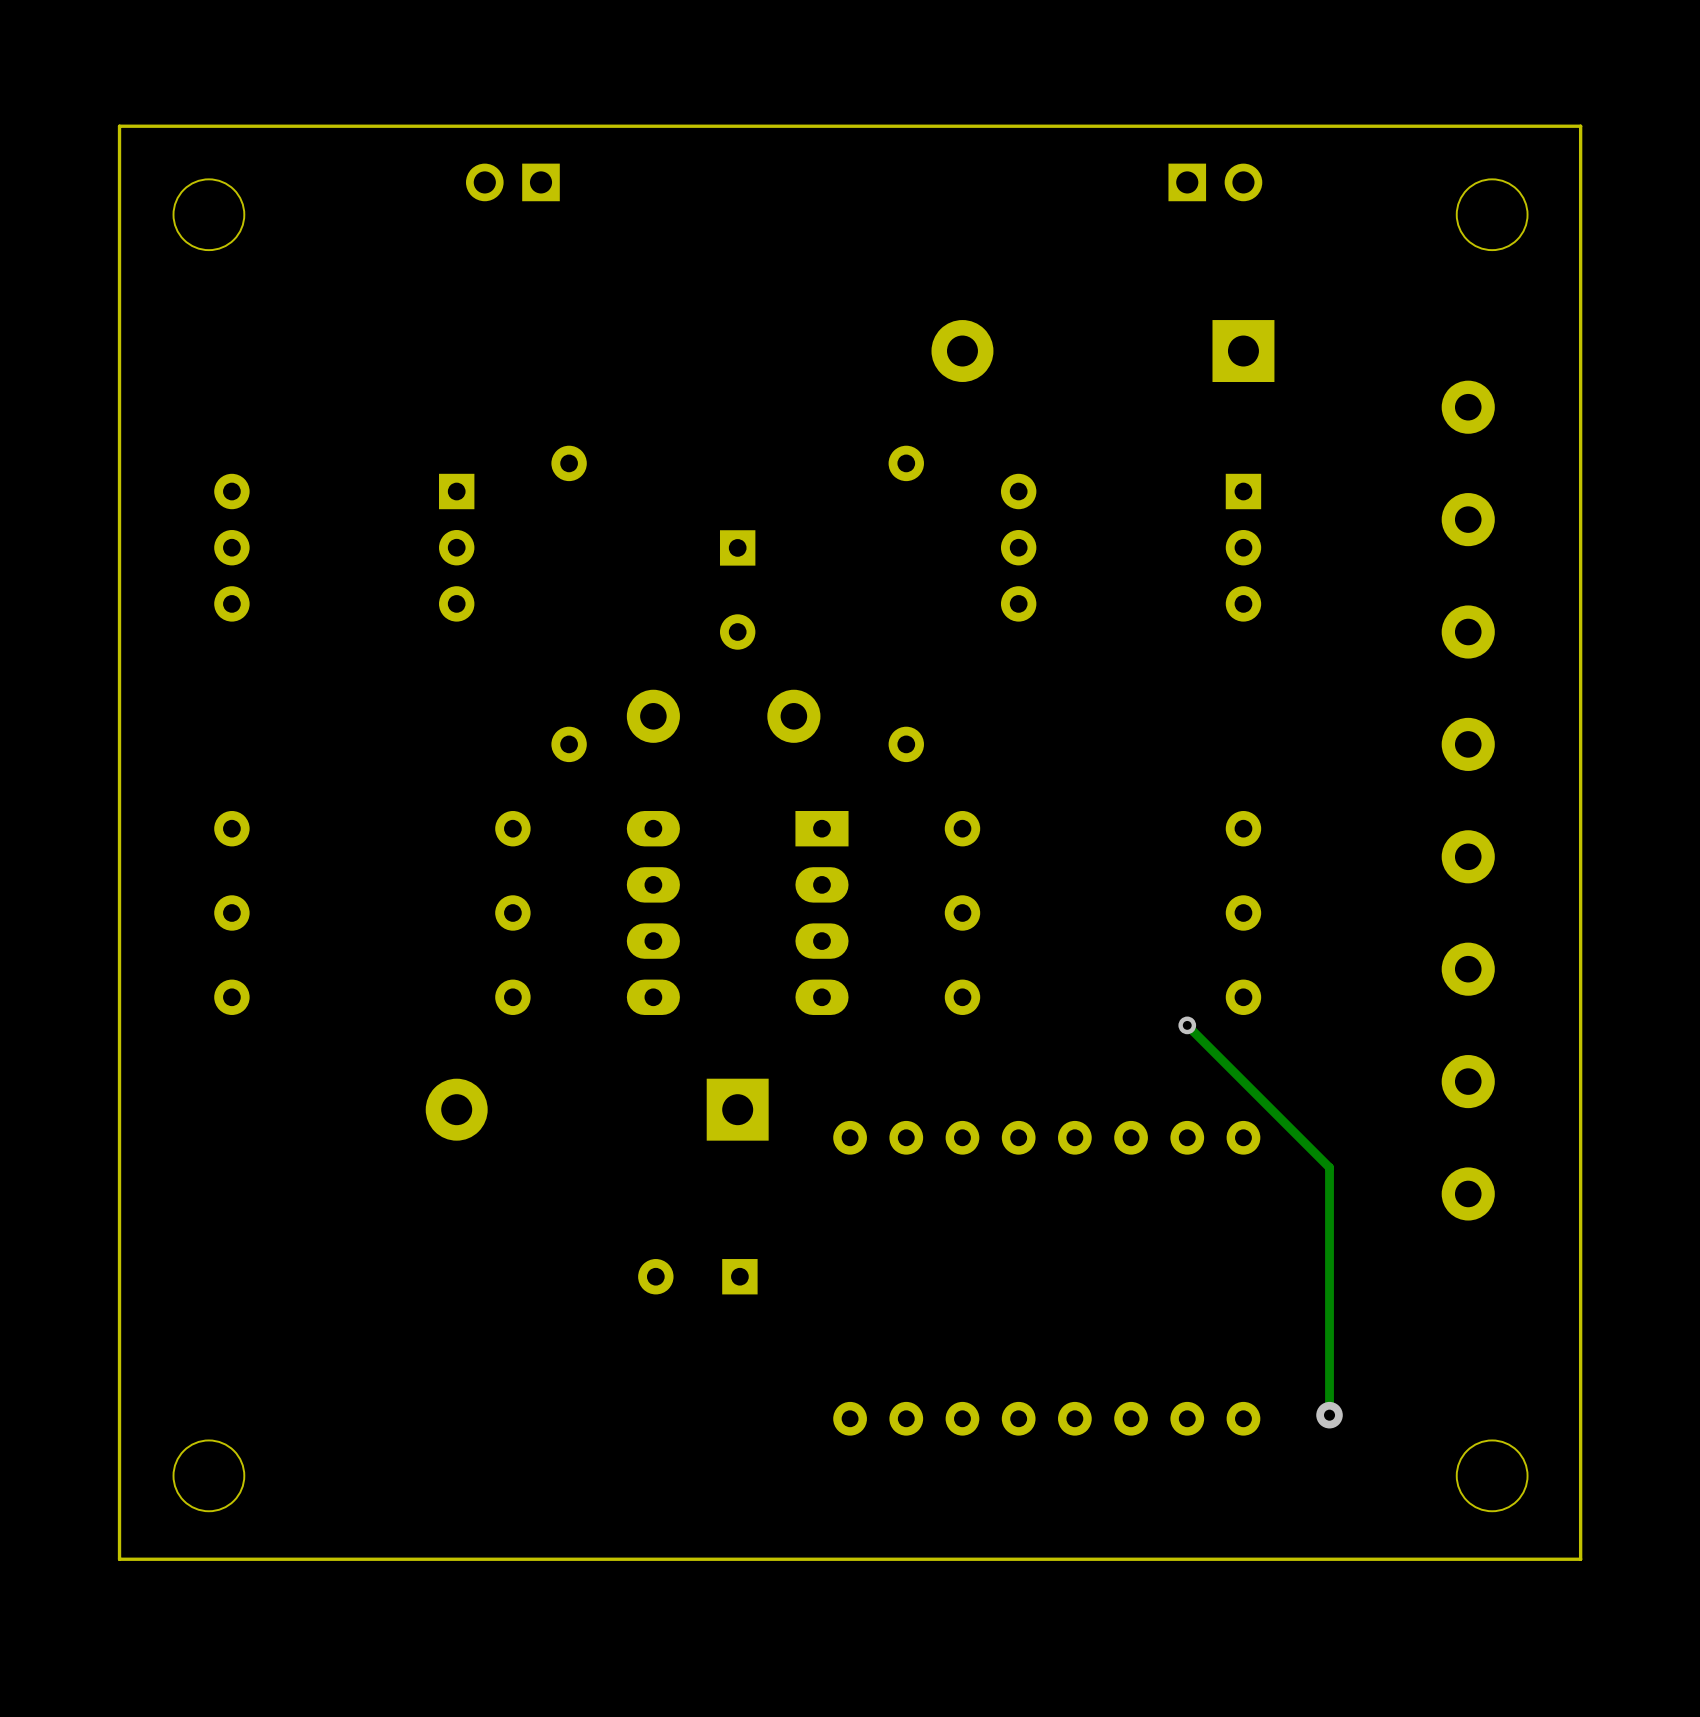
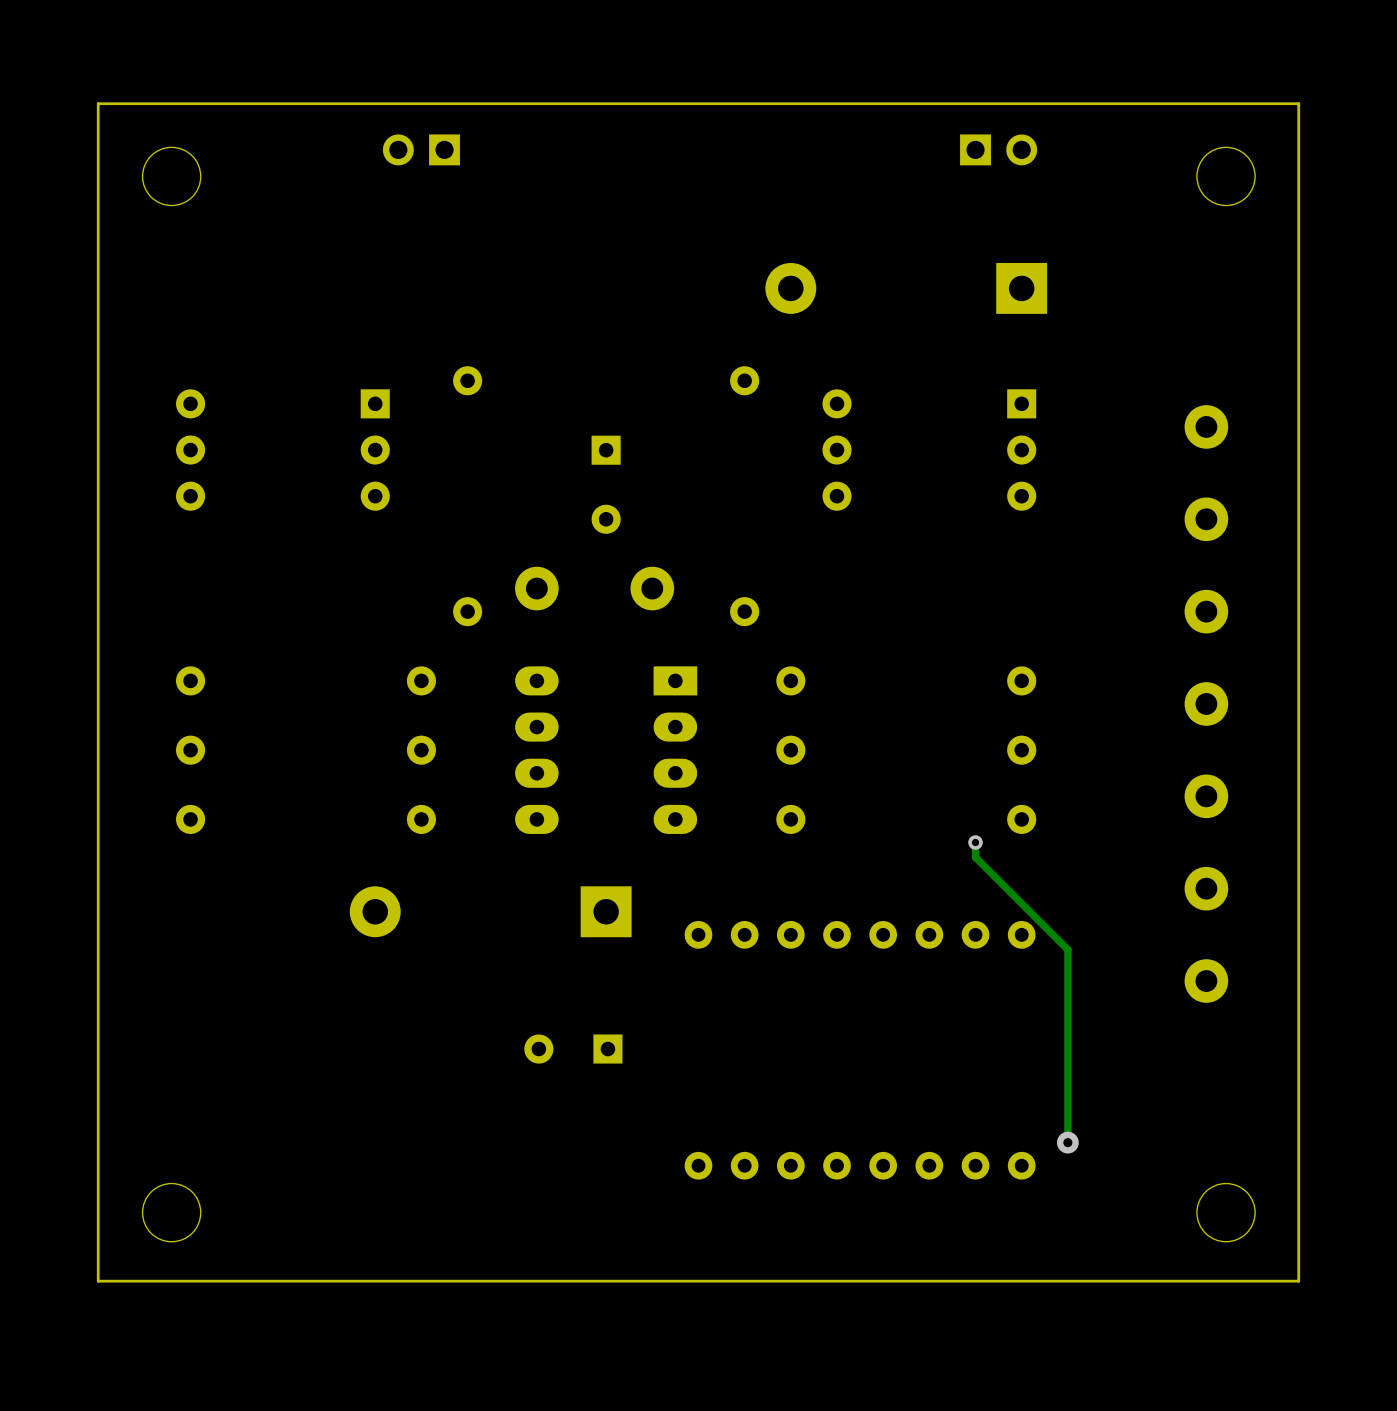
part: (1468, 407) -> none
track: (1187, 1025) (1329, 1167) (1329, 1415) -> (975, 842) (975, 857) (1067, 949) (1067, 1142)
via position: (1329, 1415) -> (1067, 1142)

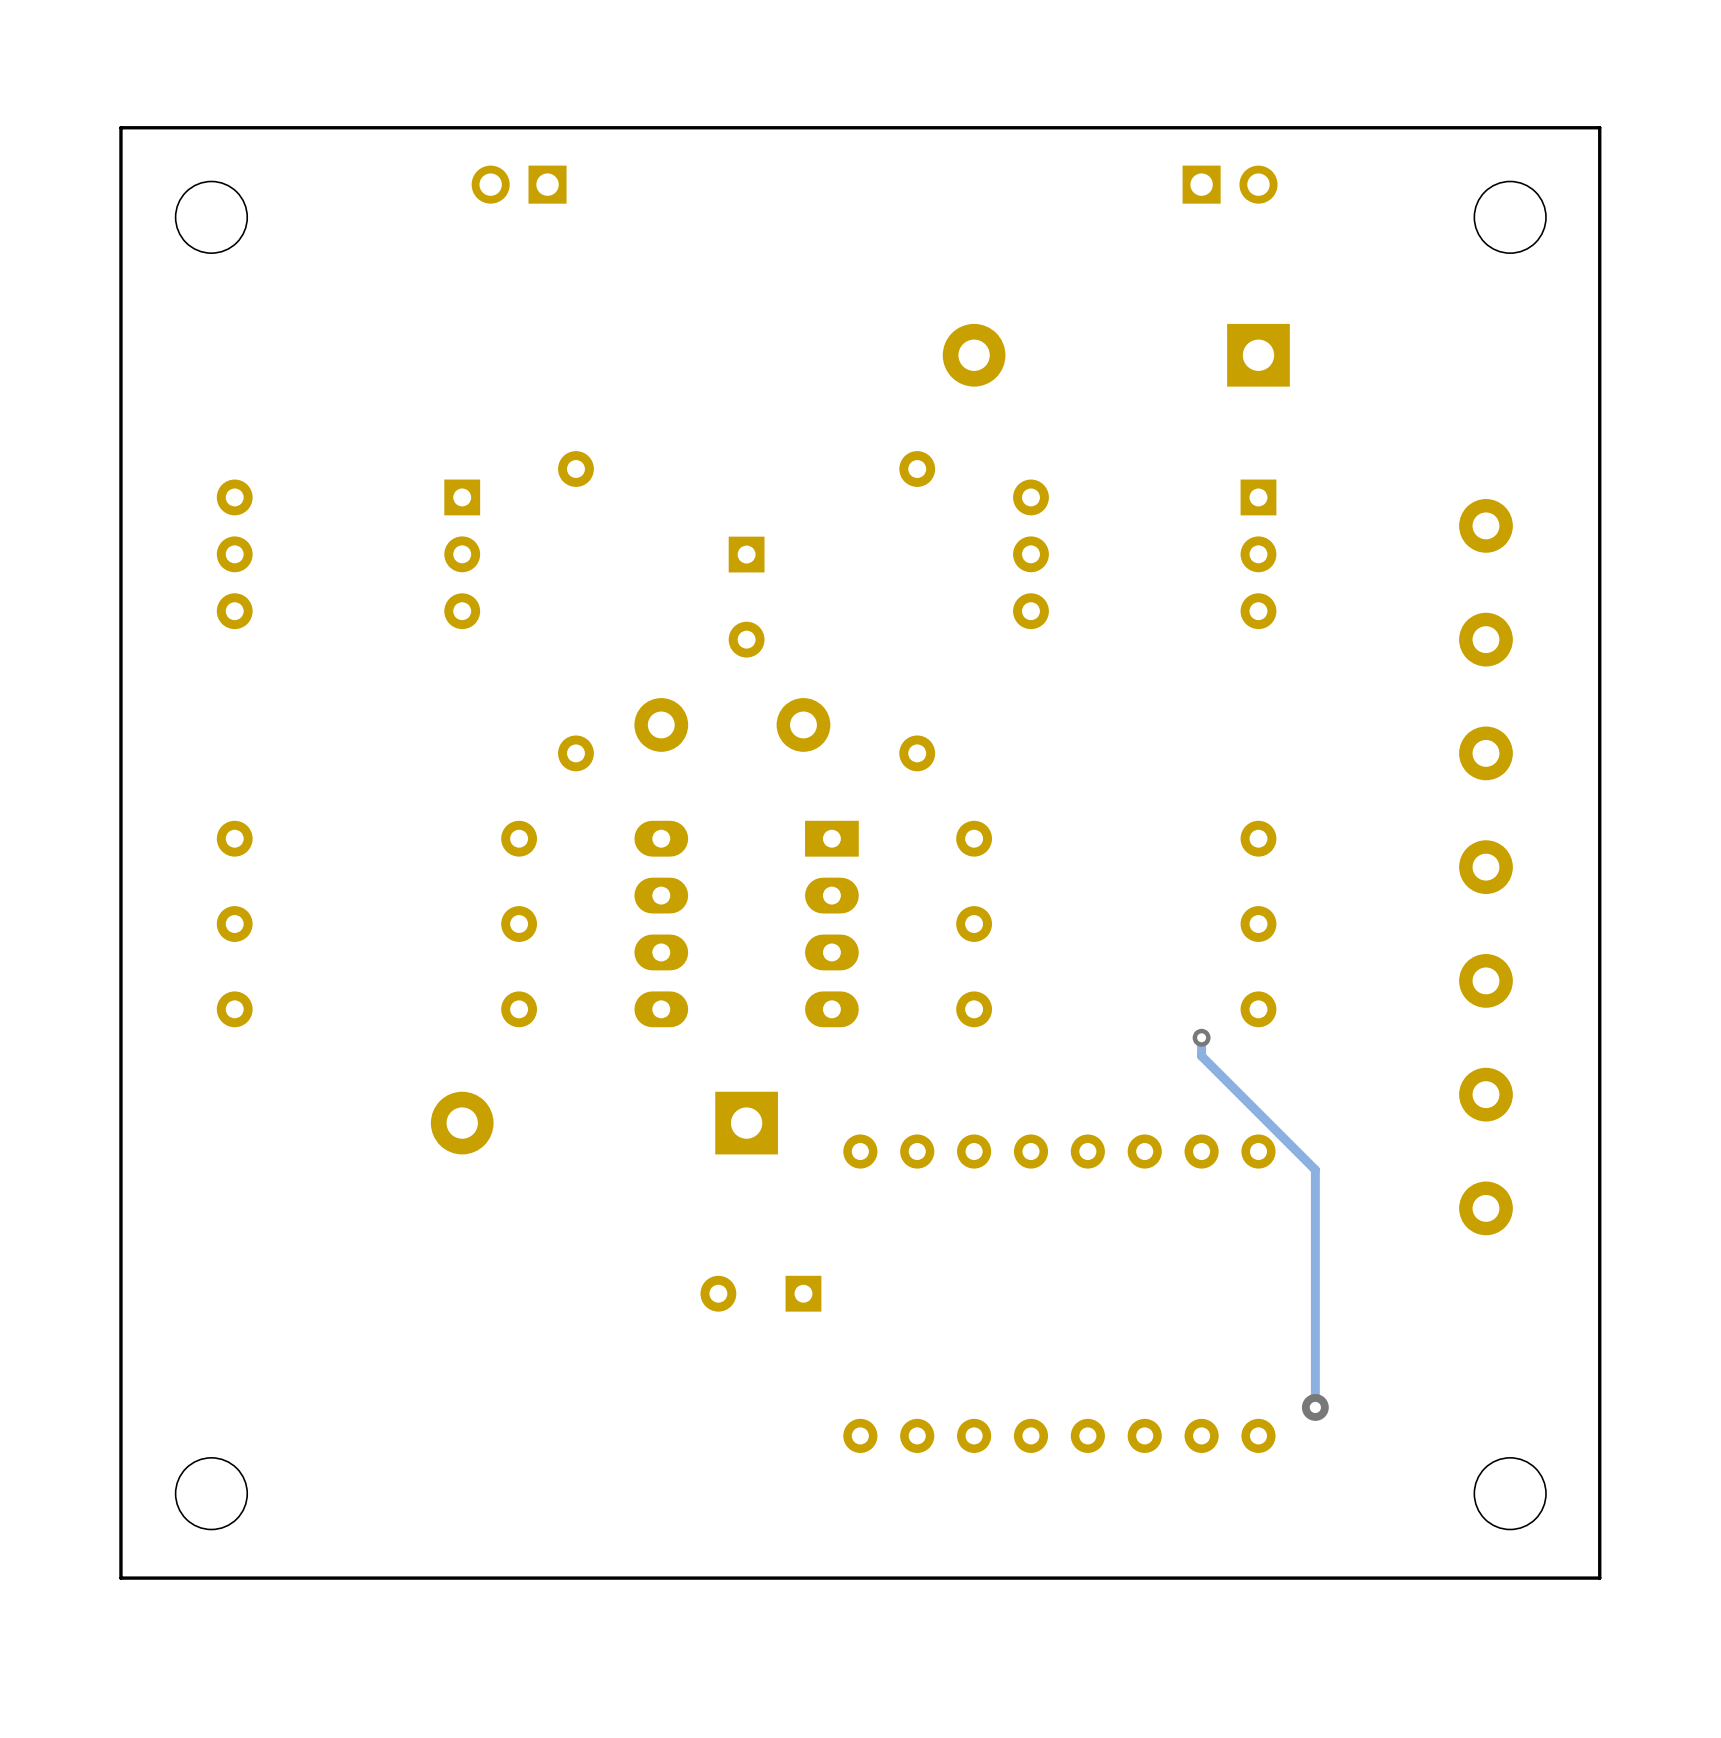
part position: (573, 1049) -> (760, 1293)

